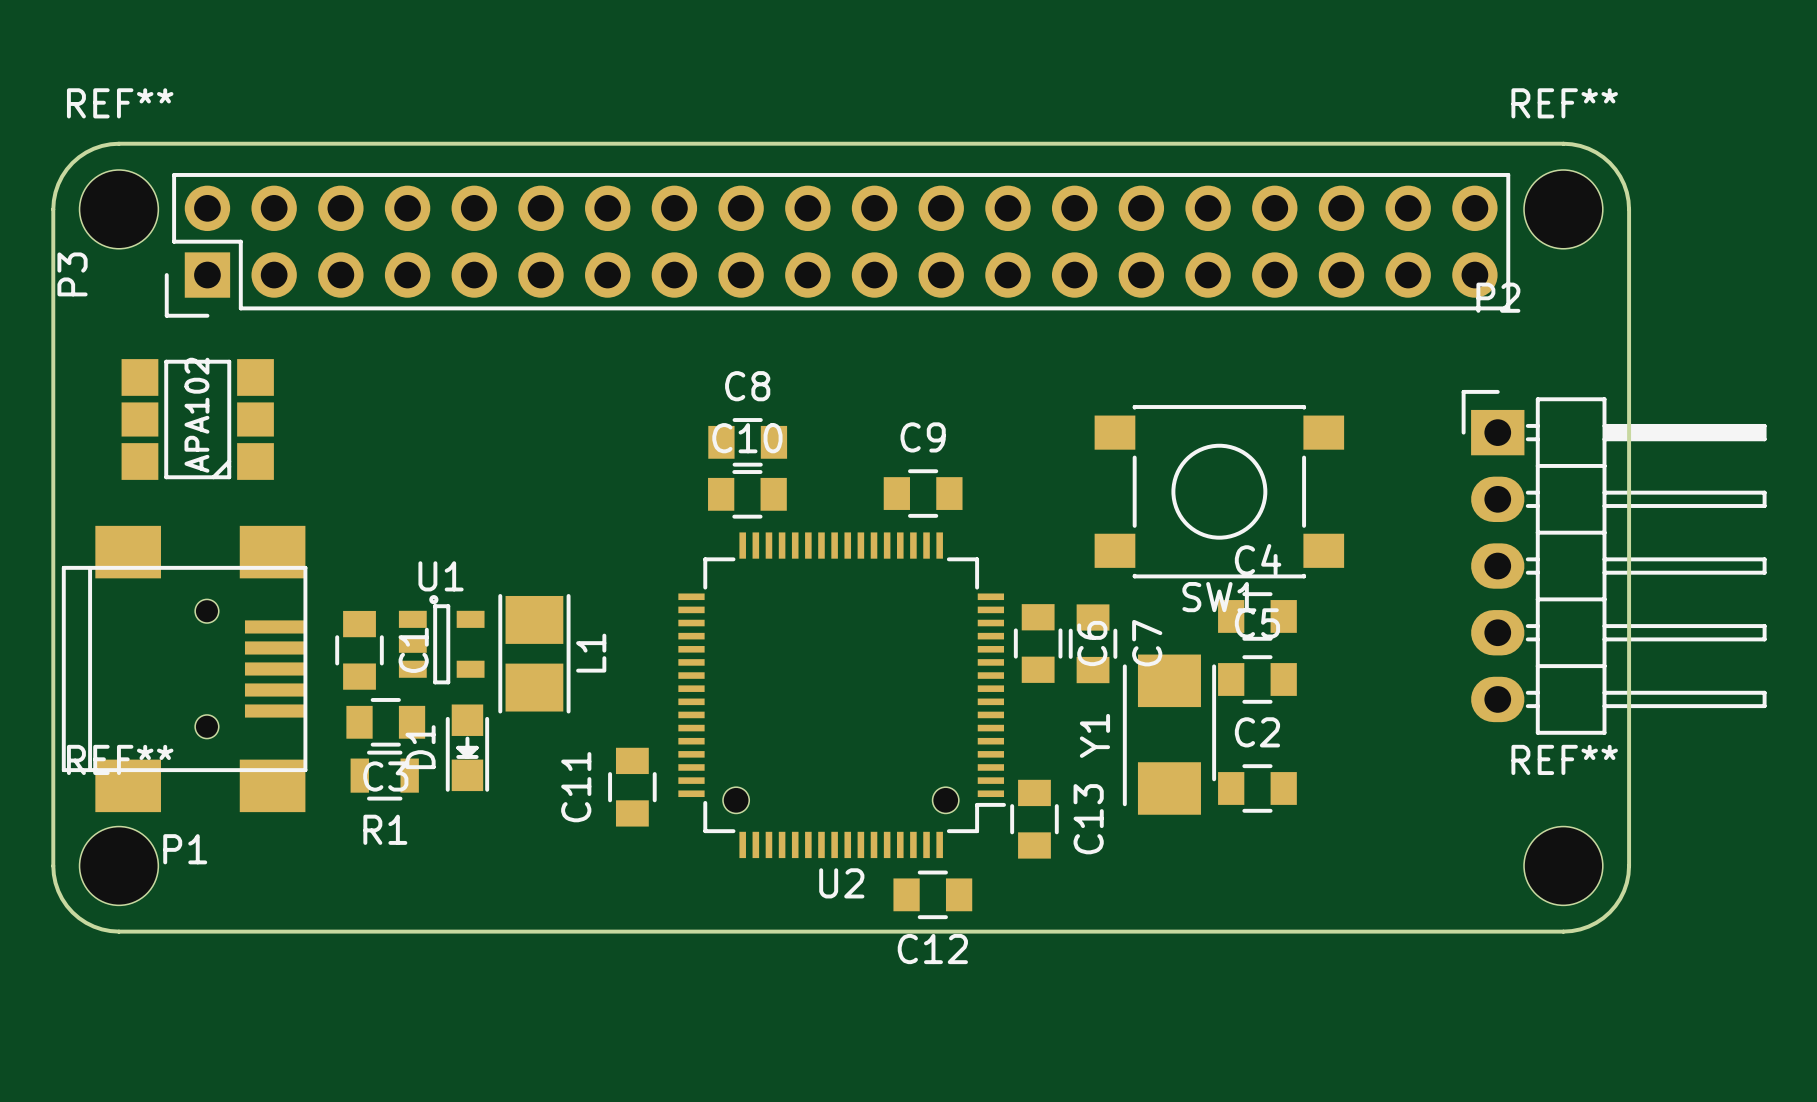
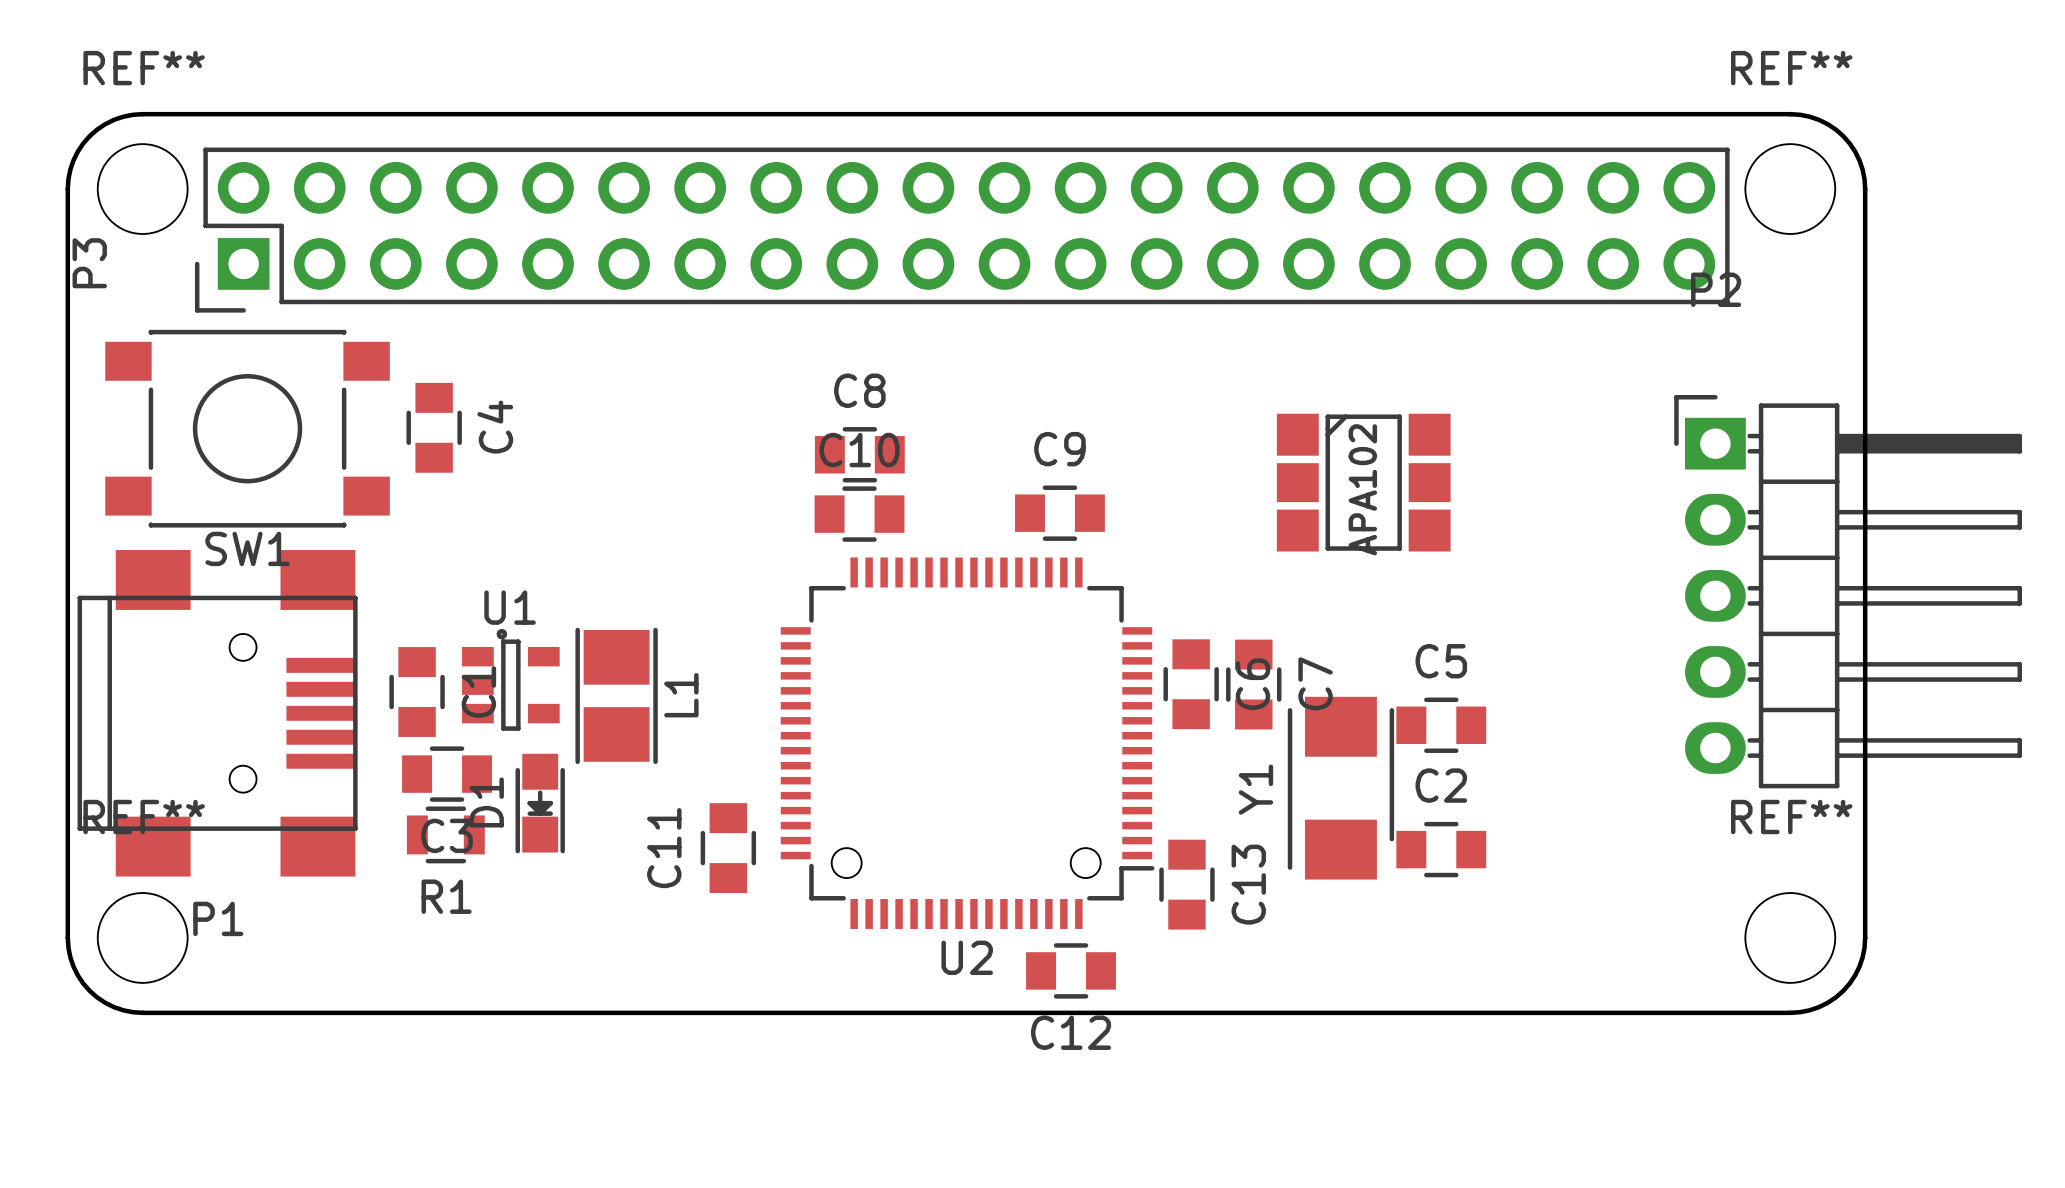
part: APA102 (197, 419) -> none
part: none -> APA102 (1363, 482)
SW1 position: (1219, 491) -> (247, 428)
C4 rotation: 0° (1257, 616) -> 90° clockwise (434, 427)
C4 position: (1257, 616) -> (434, 427)

